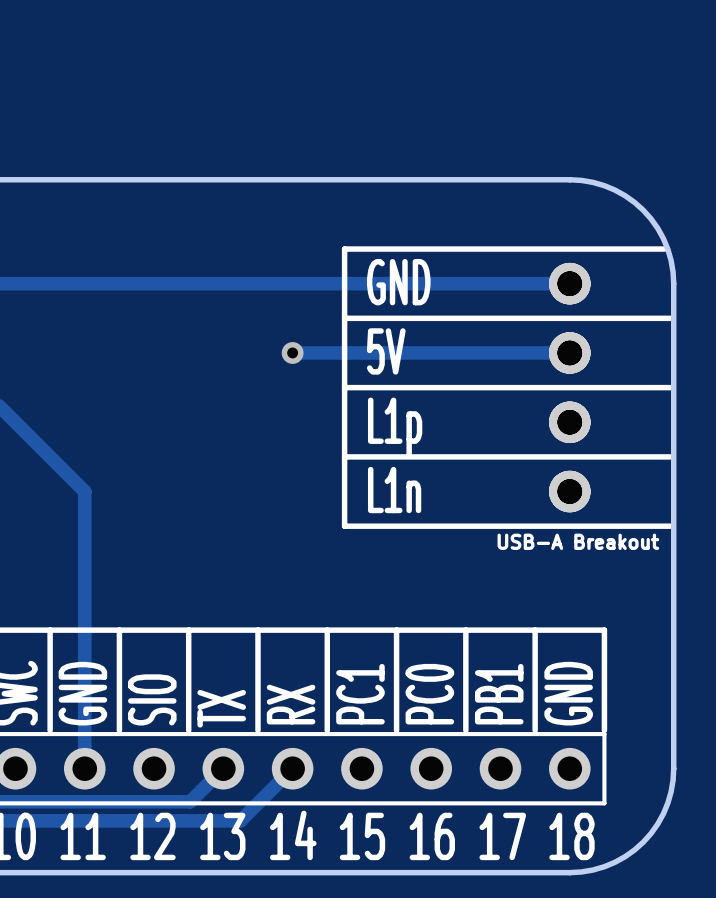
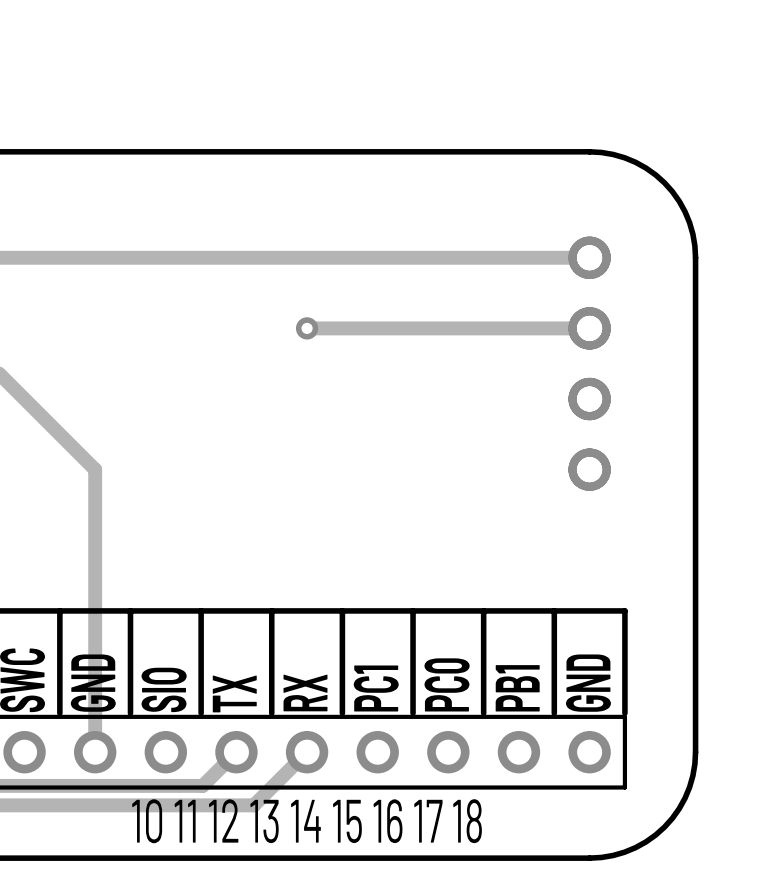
line: (664, 249) (344, 249) (344, 526) (670, 526) -> none
text: GND (398, 282) -> none
line: (344, 318) (670, 318) -> none
text: 5V (386, 351) -> none
line: (344, 387) (670, 387) -> none
text: L1p (395, 427) -> none
line: (344, 456) (670, 456) -> none
text: L1n (394, 490) -> none
text: USB-A Breakout (578, 541) -> none

